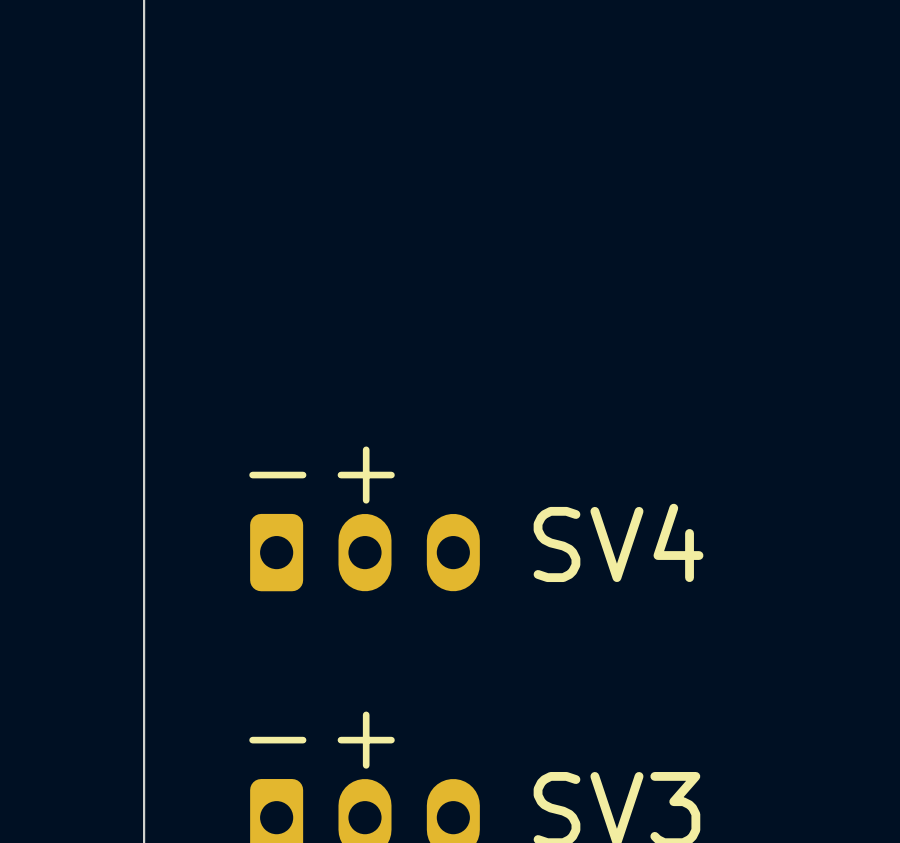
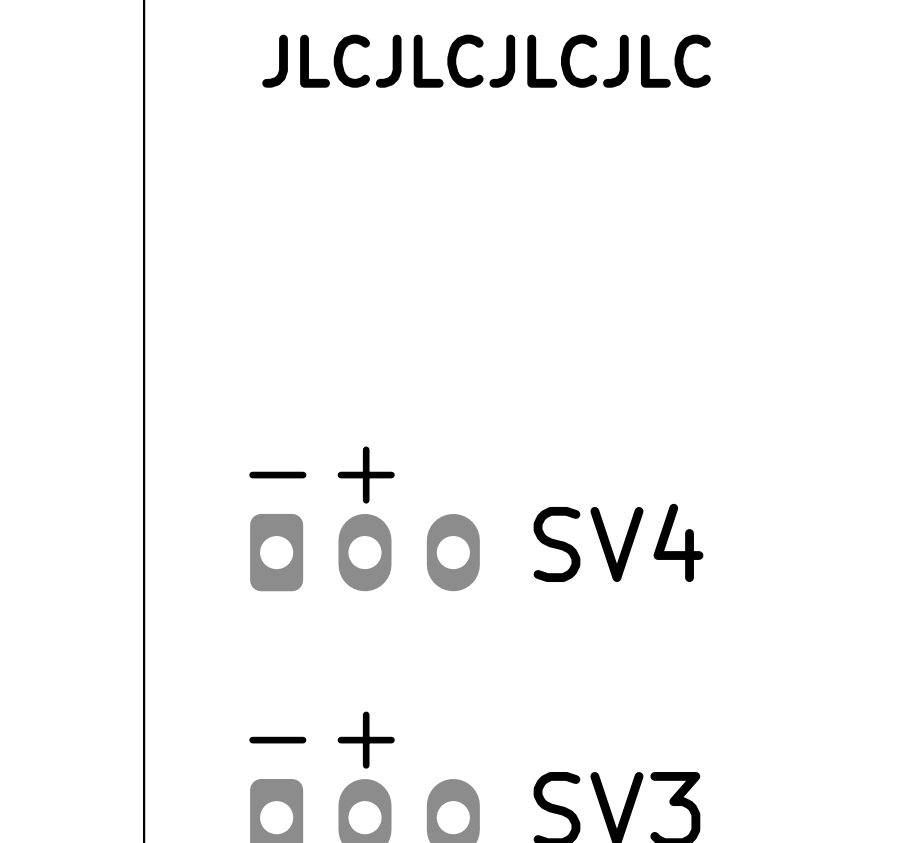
text: none -> JLCJLCJLCJLC (486, 61)

